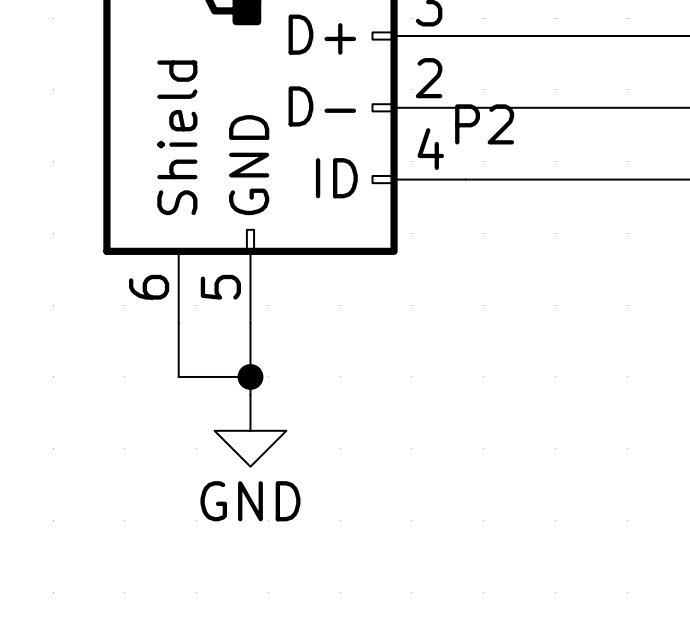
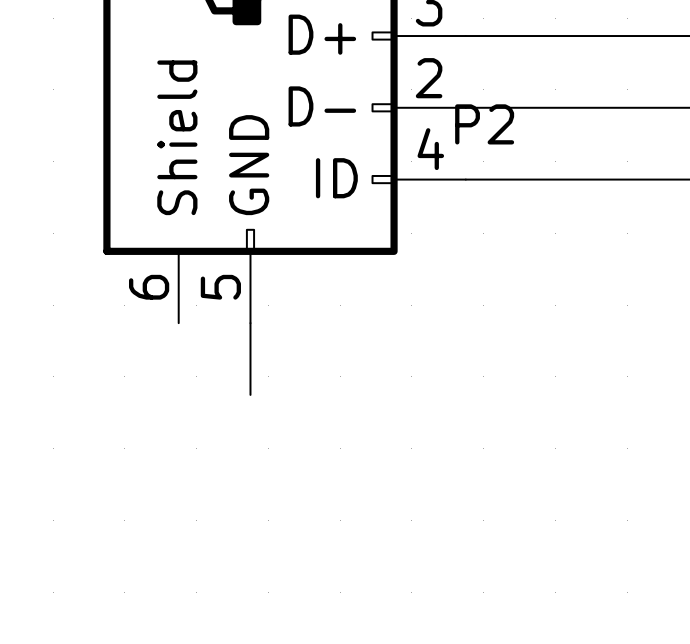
wire: (178, 323) (178, 376) (250, 376) -> none
junction: (250, 376) -> none
power symbol: GND (250, 430) -> none

